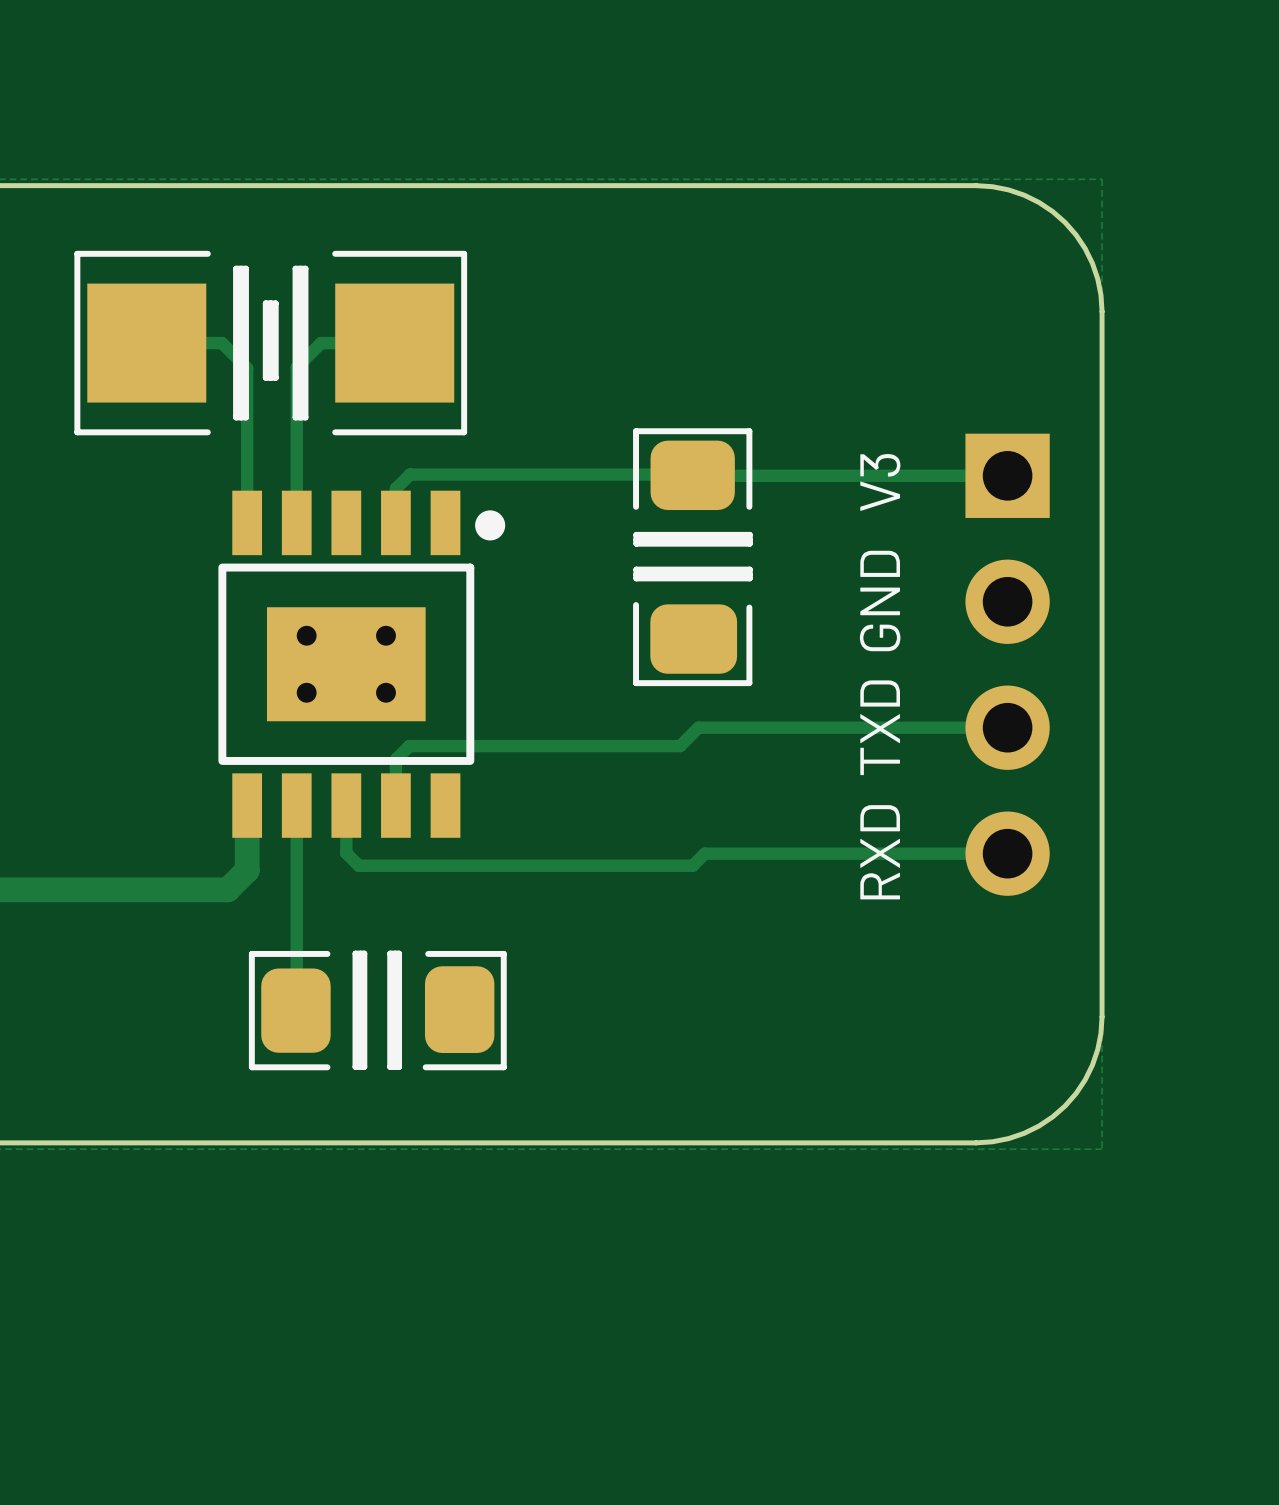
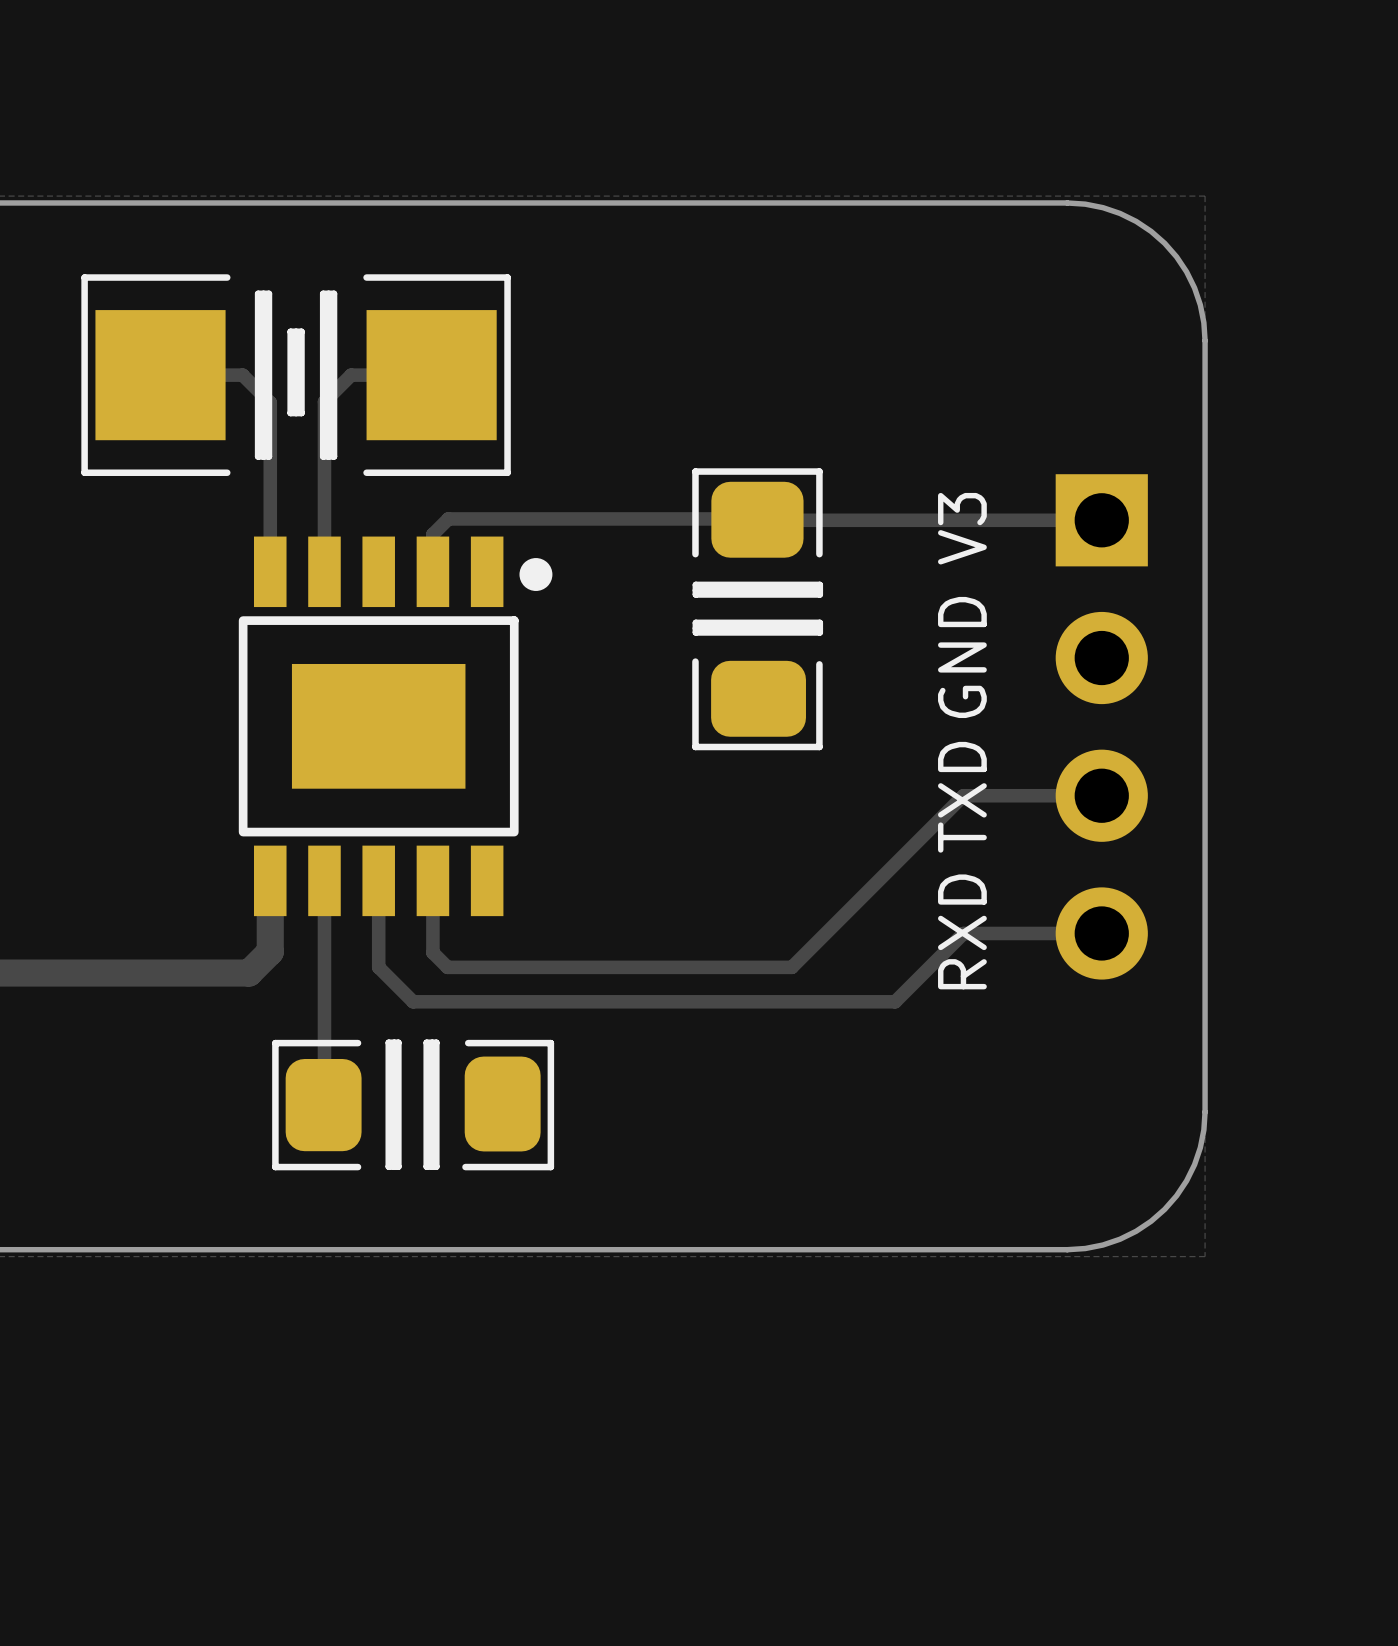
part footprint: [218, 490, 506, 838] -> [238, 536, 553, 917]
track: (881, 727) (698, 727) (680, 746) (409, 746) (395, 759) (395, 805) -> (963, 795) (791, 967) (447, 967) (432, 952) (432, 880)
track: (346, 853) (358, 865) (692, 865) (704, 853) (881, 853) -> (378, 932) (378, 967) (413, 1001) (895, 1001) (963, 933)

